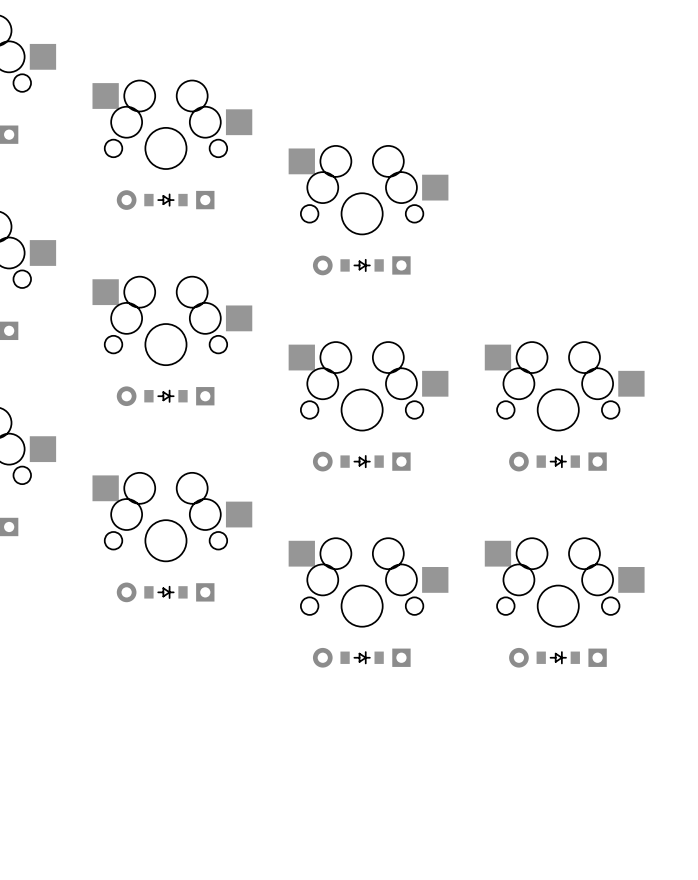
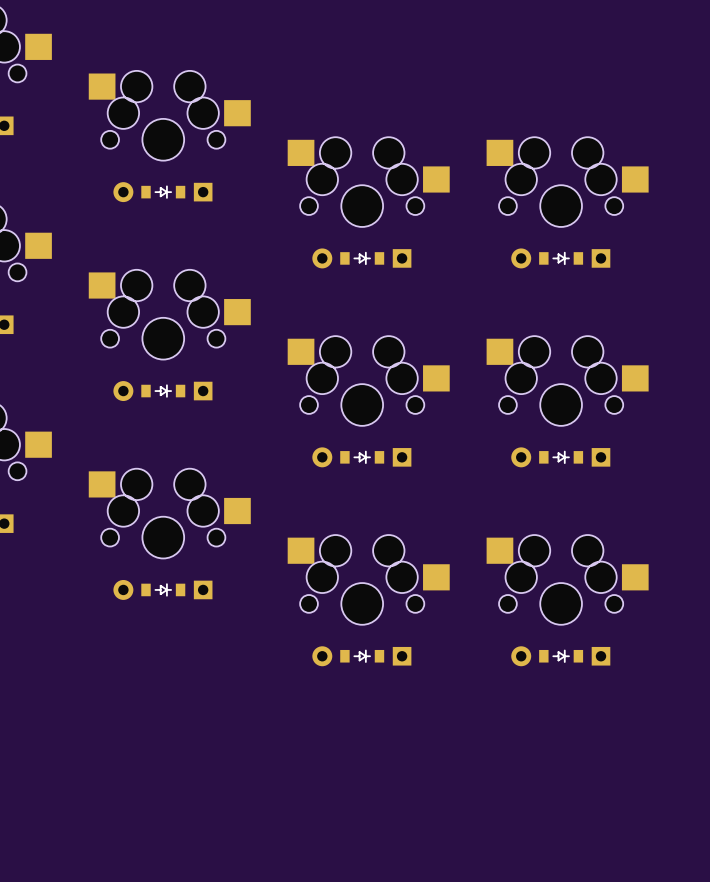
part: none -> (567, 182)
part: none -> (560, 258)

